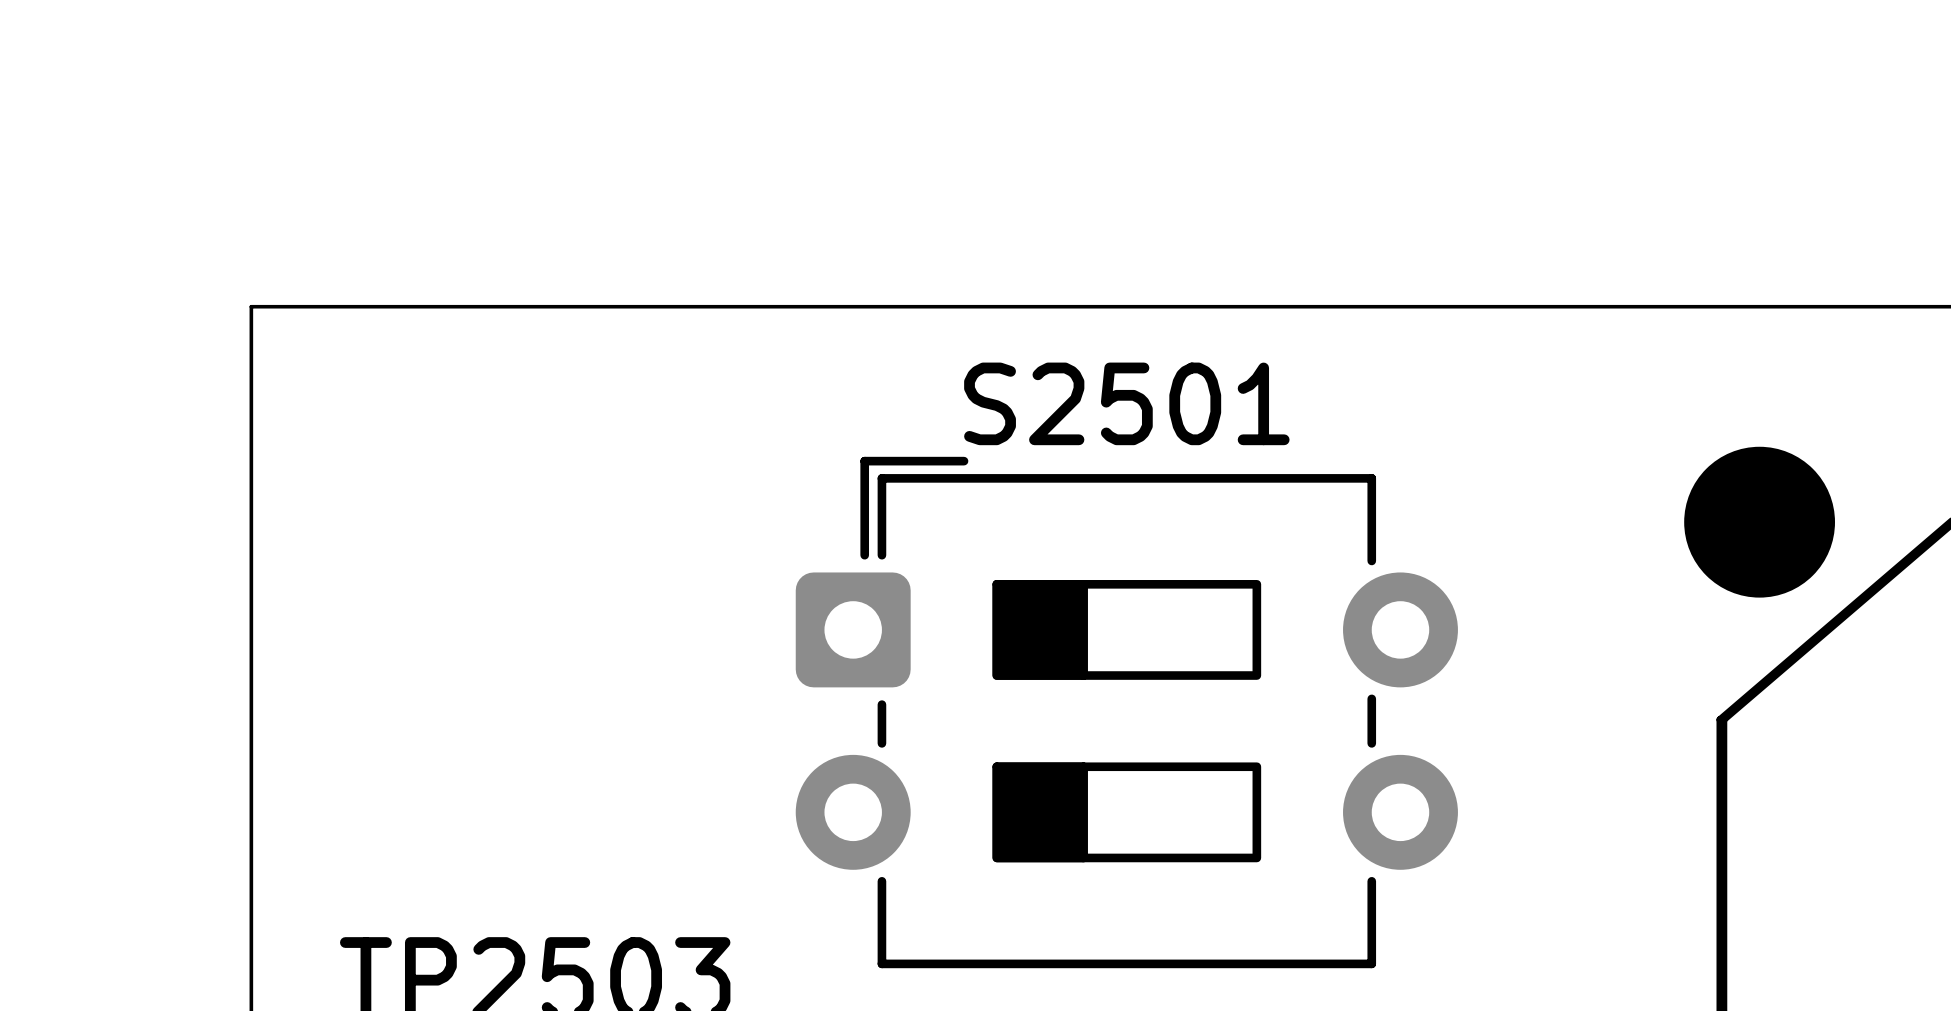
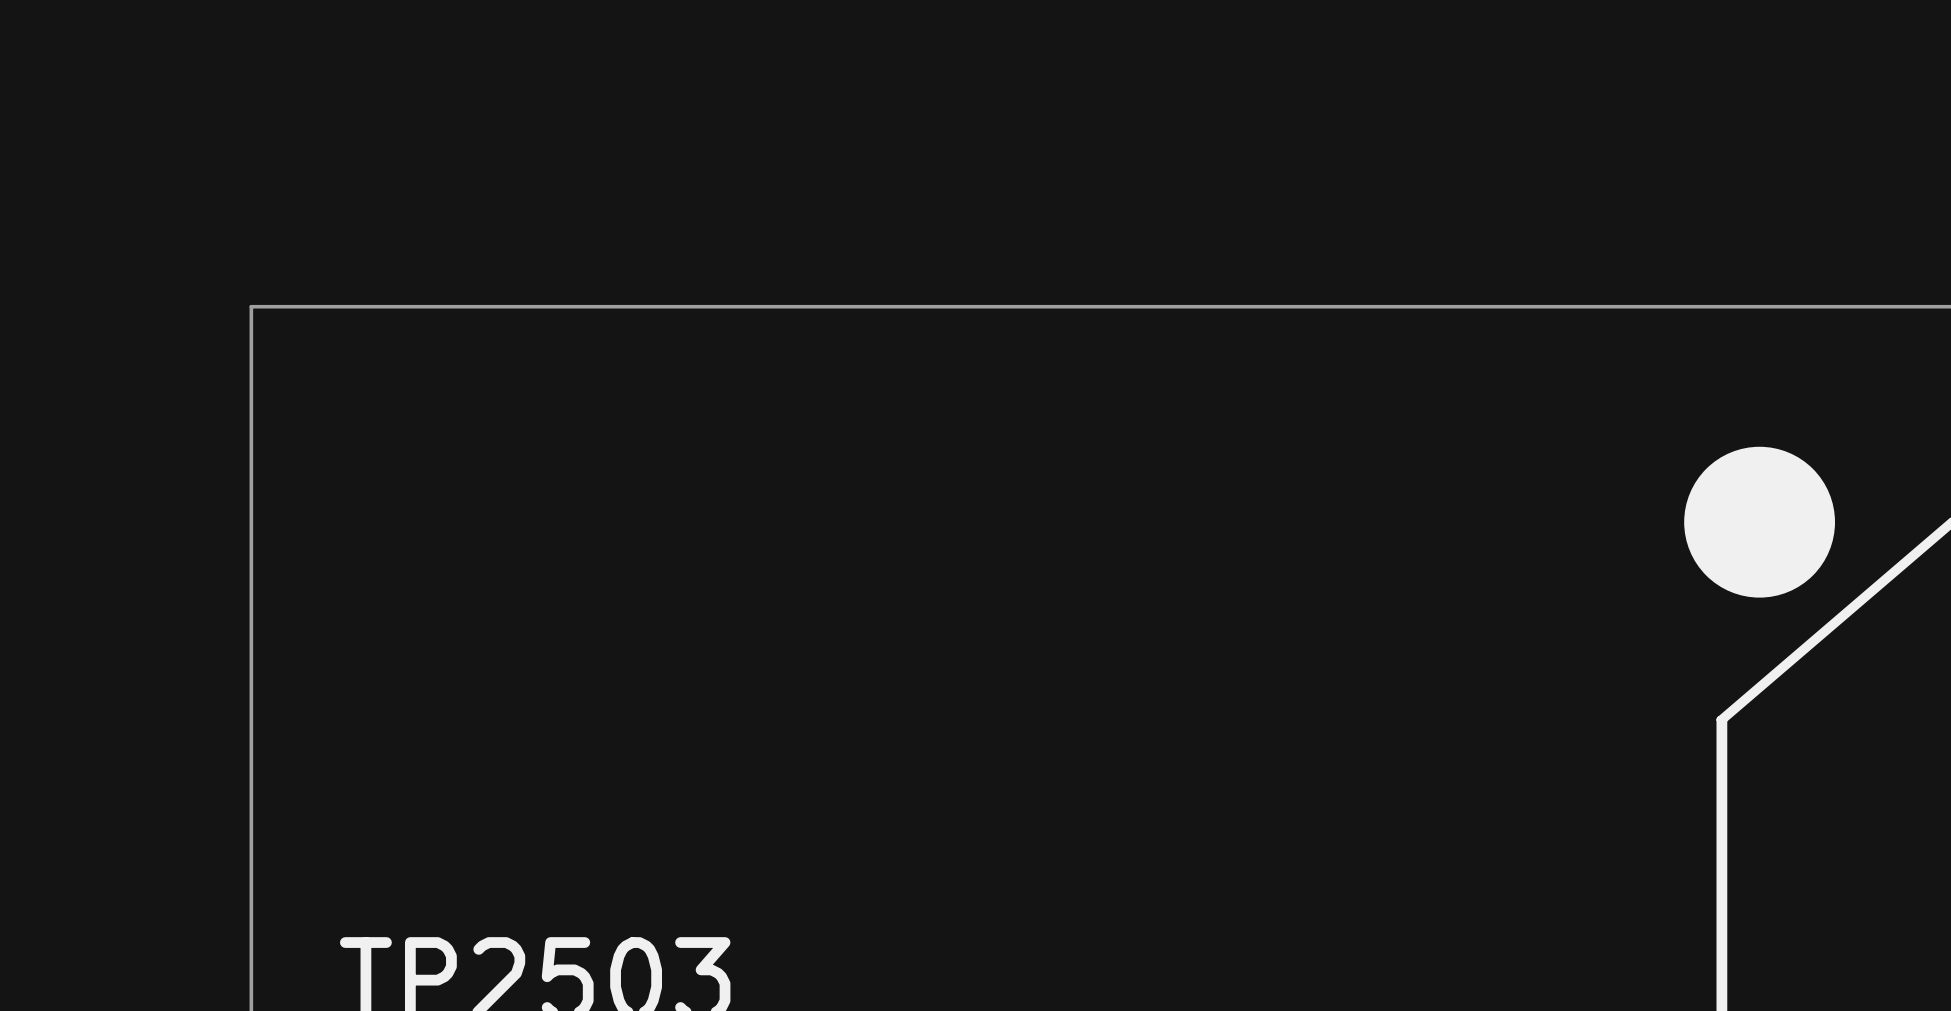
S2501: (1126, 712) -> none

